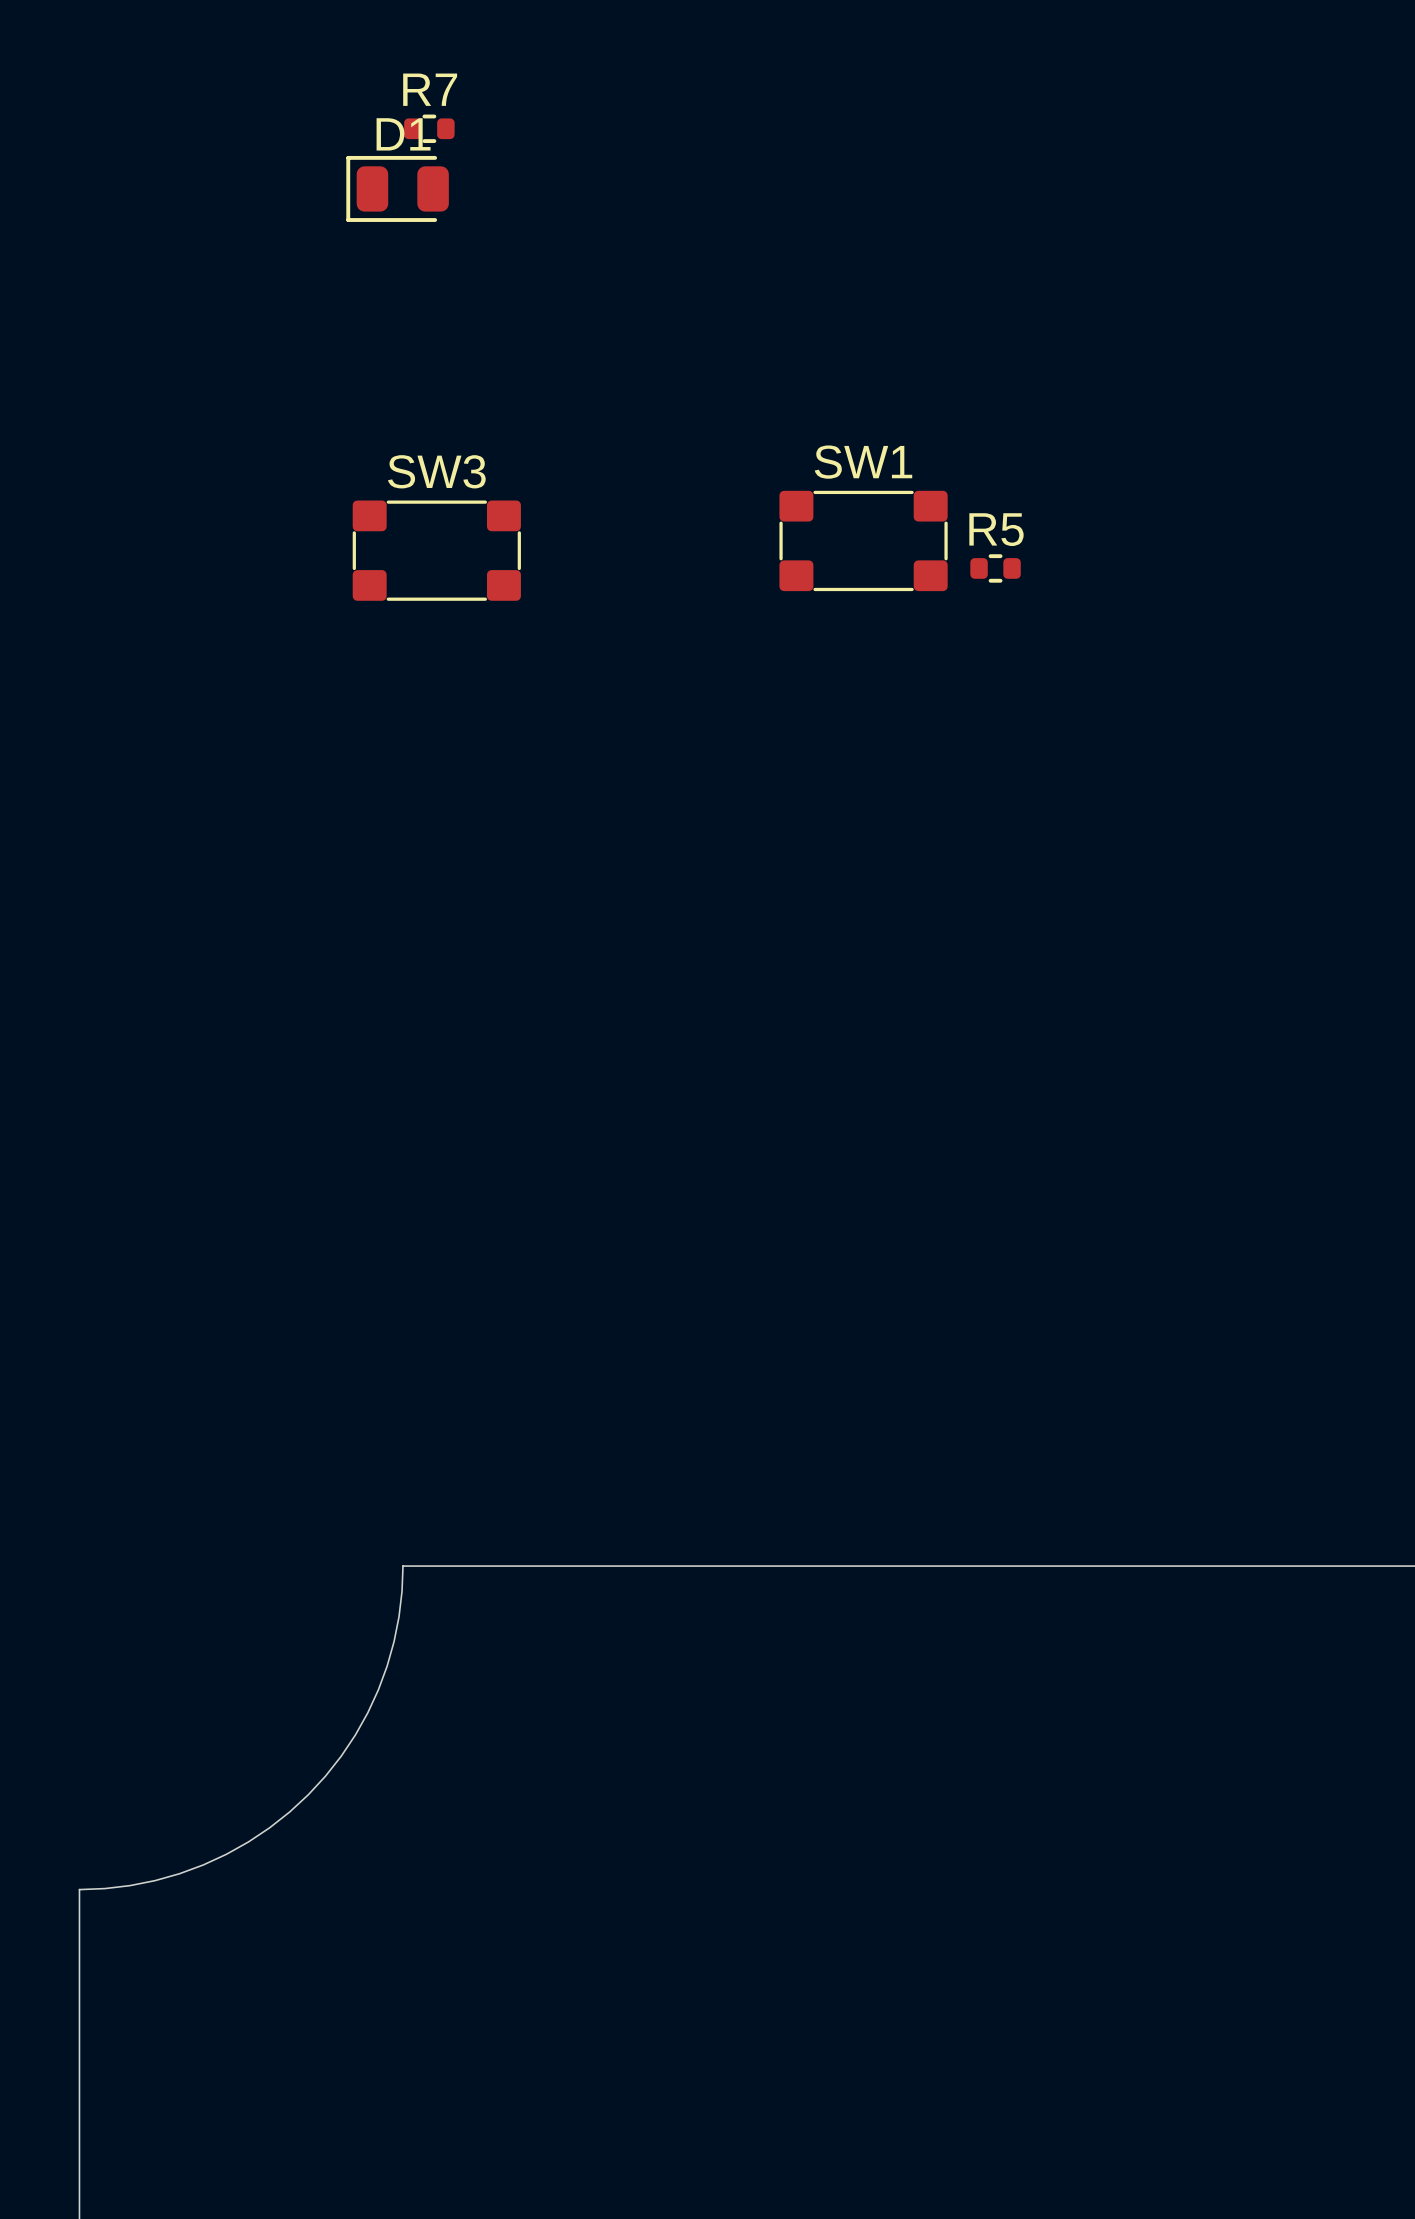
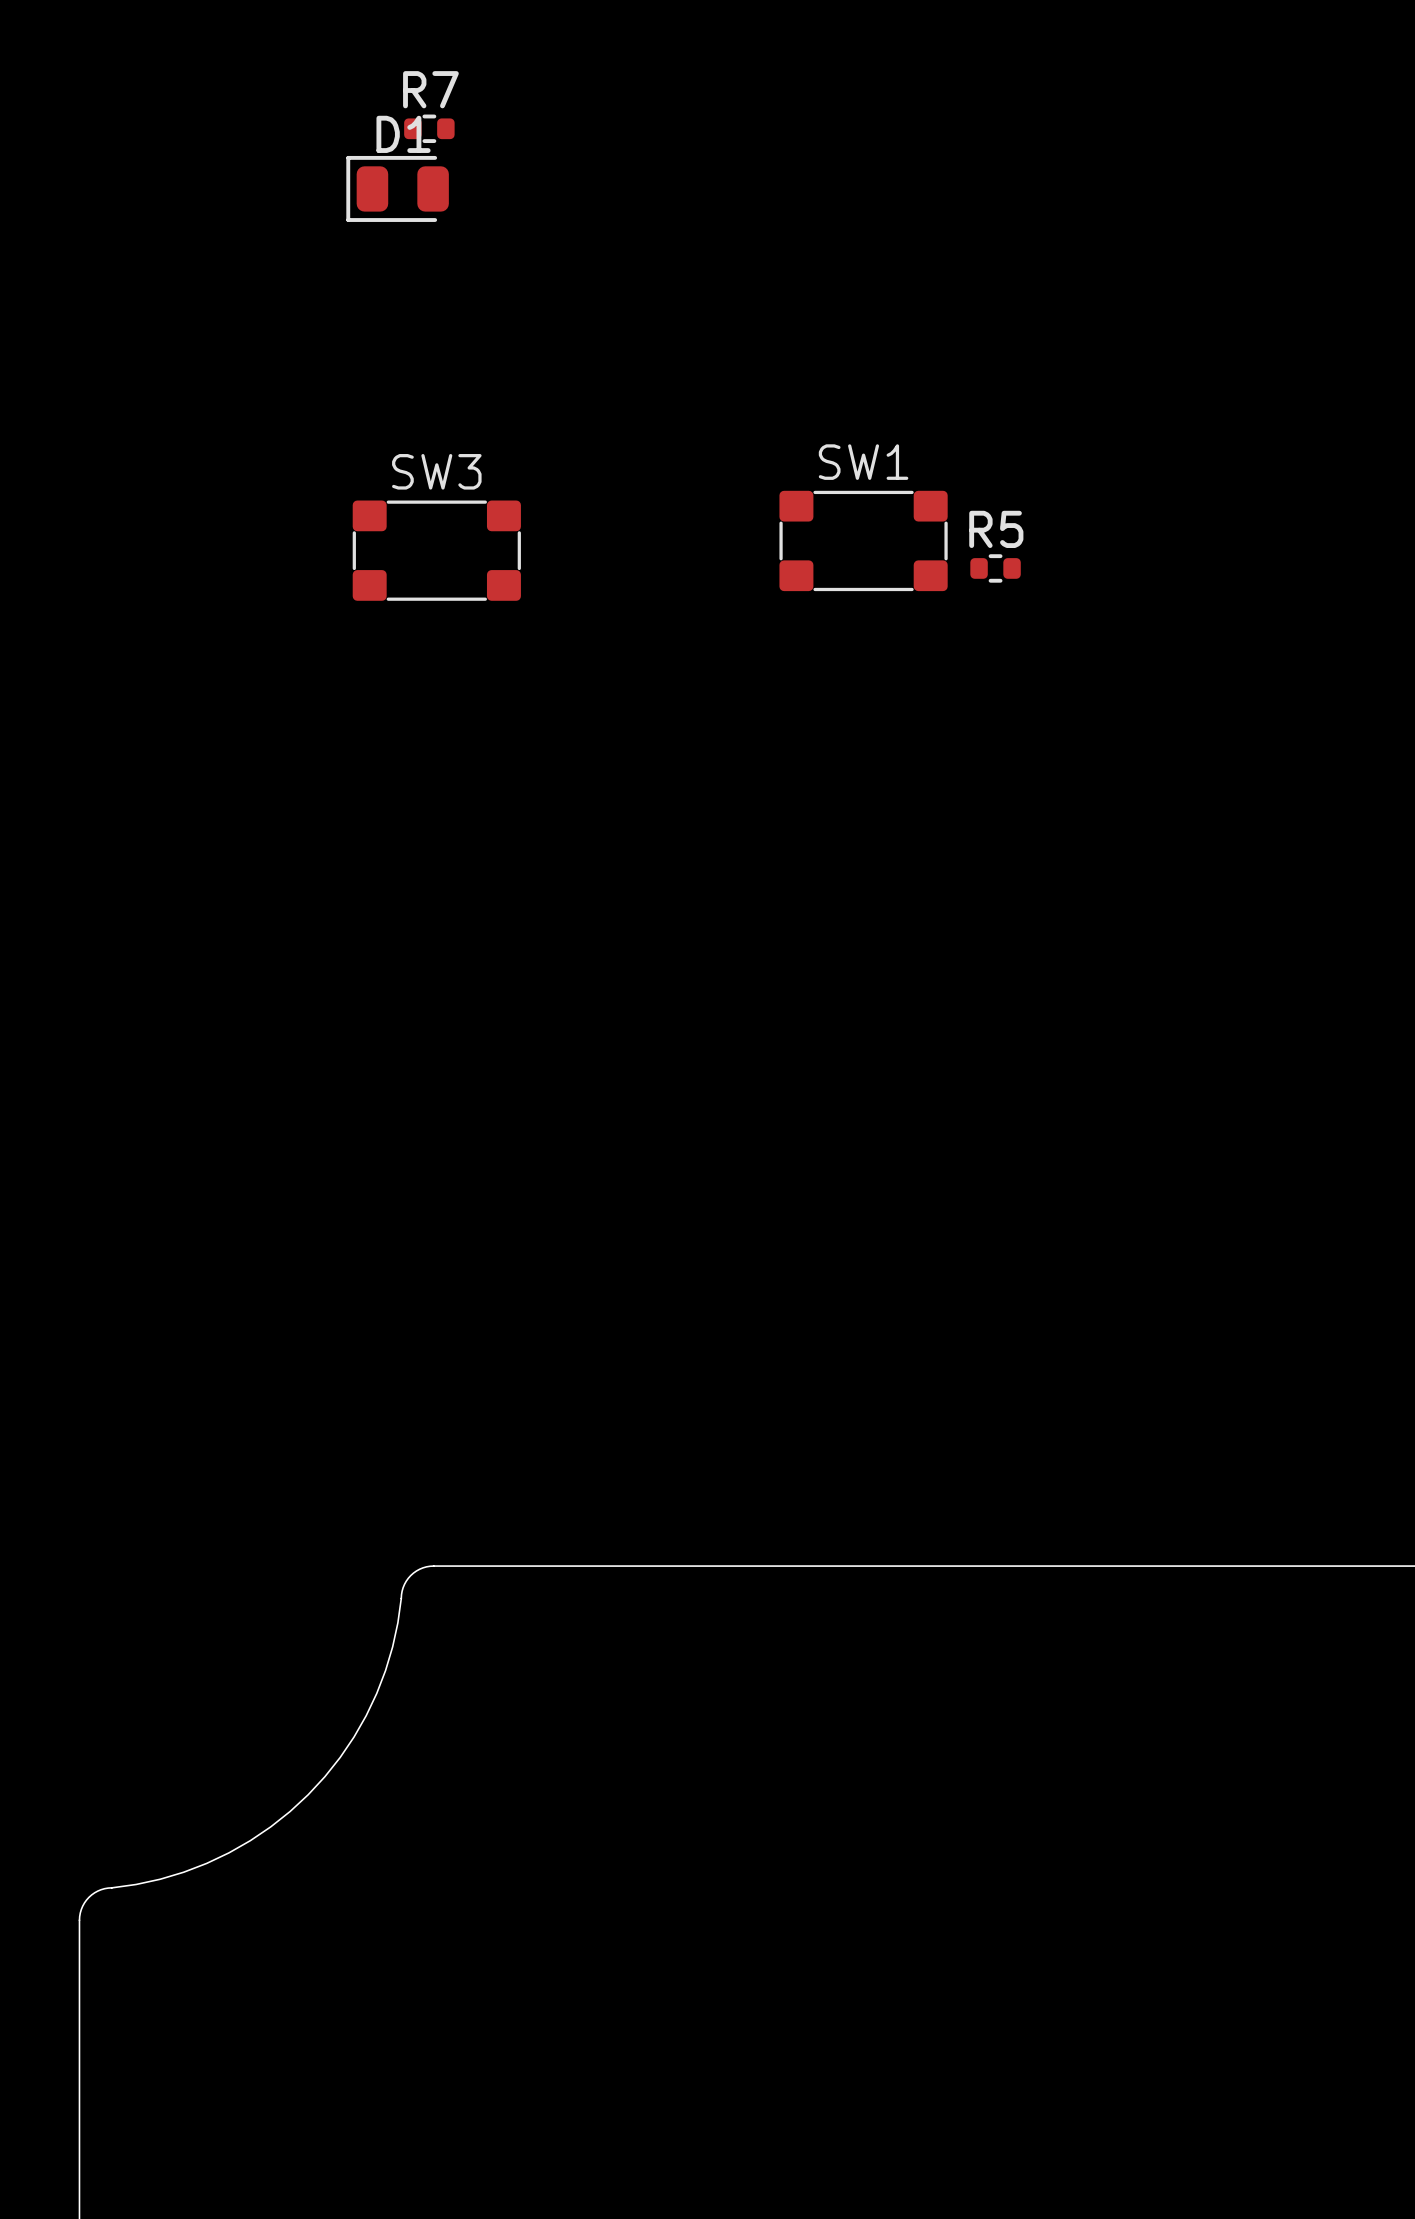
board edge: (433, 1566) (403, 1566) (399, 1616) (394, 1641) (378, 1689) (367, 1712) (341, 1756) (308, 1794) (289, 1812) (248, 1841) (203, 1864) (155, 1880) (130, 1885) (79, 1889) (79, 1920) -> (433, 1566) (416, 1571) (404, 1584) (392, 1646) (376, 1693) (366, 1715) (340, 1757) (308, 1794) (290, 1811) (250, 1840) (206, 1863) (160, 1879) (97, 1891) (84, 1903) (79, 1920)

